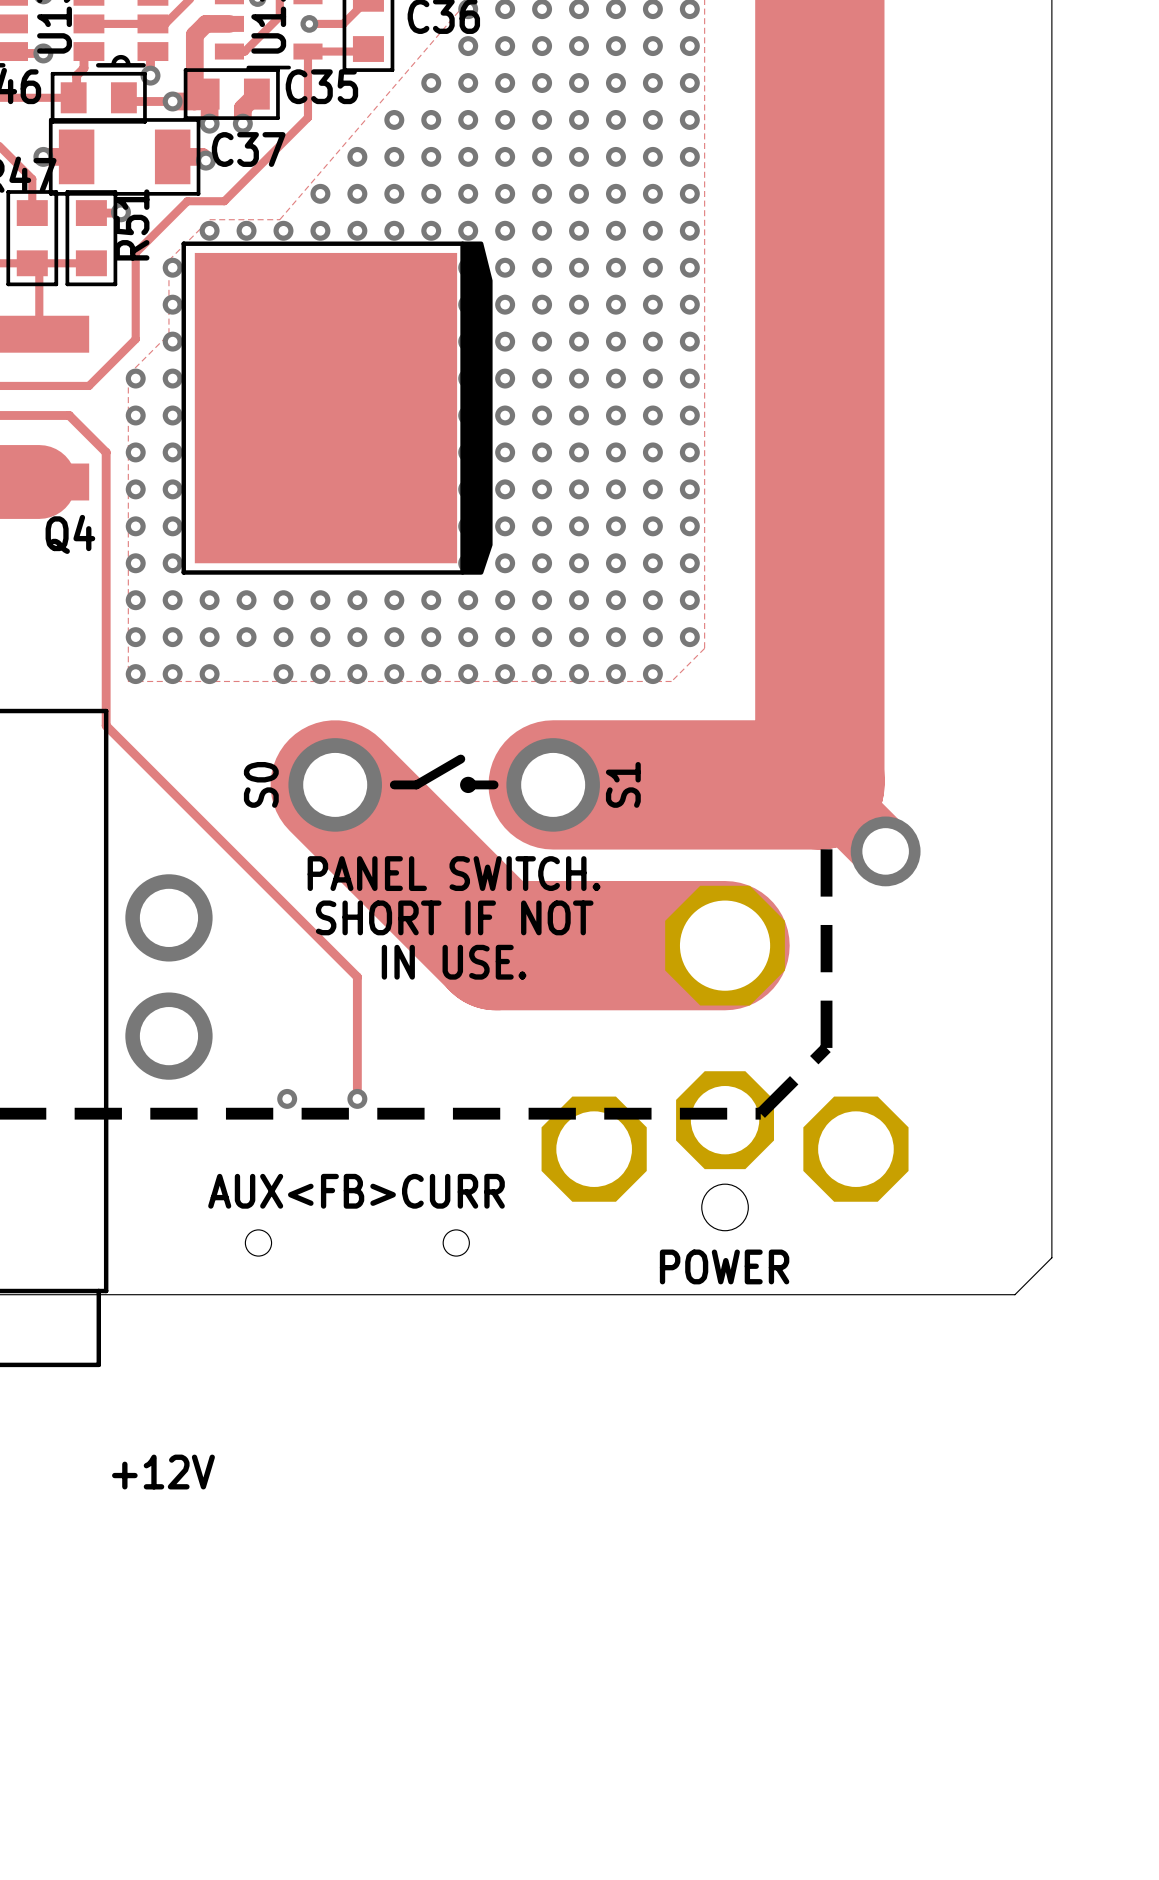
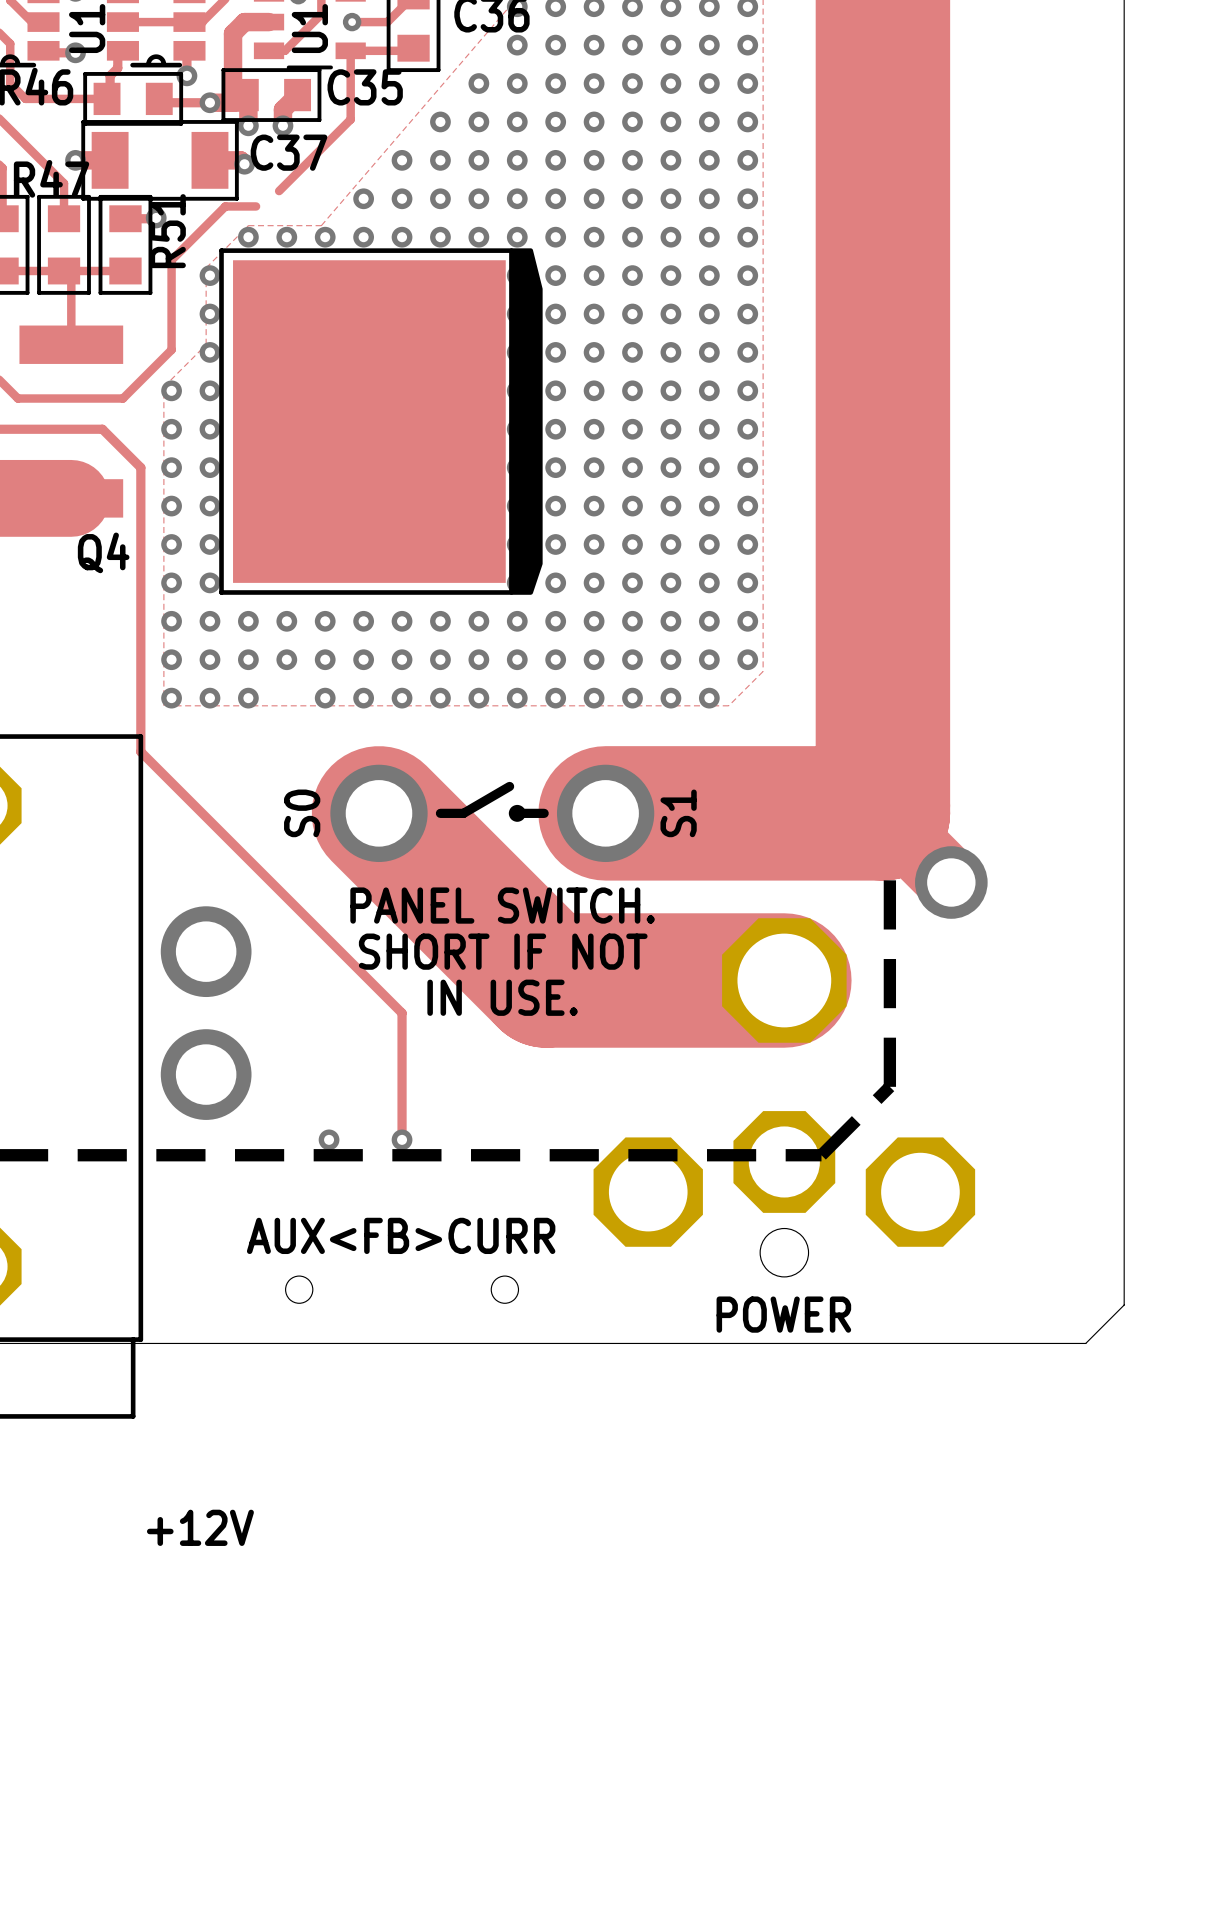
track: (239, 186) (224, 201) (216, 201) -> none

